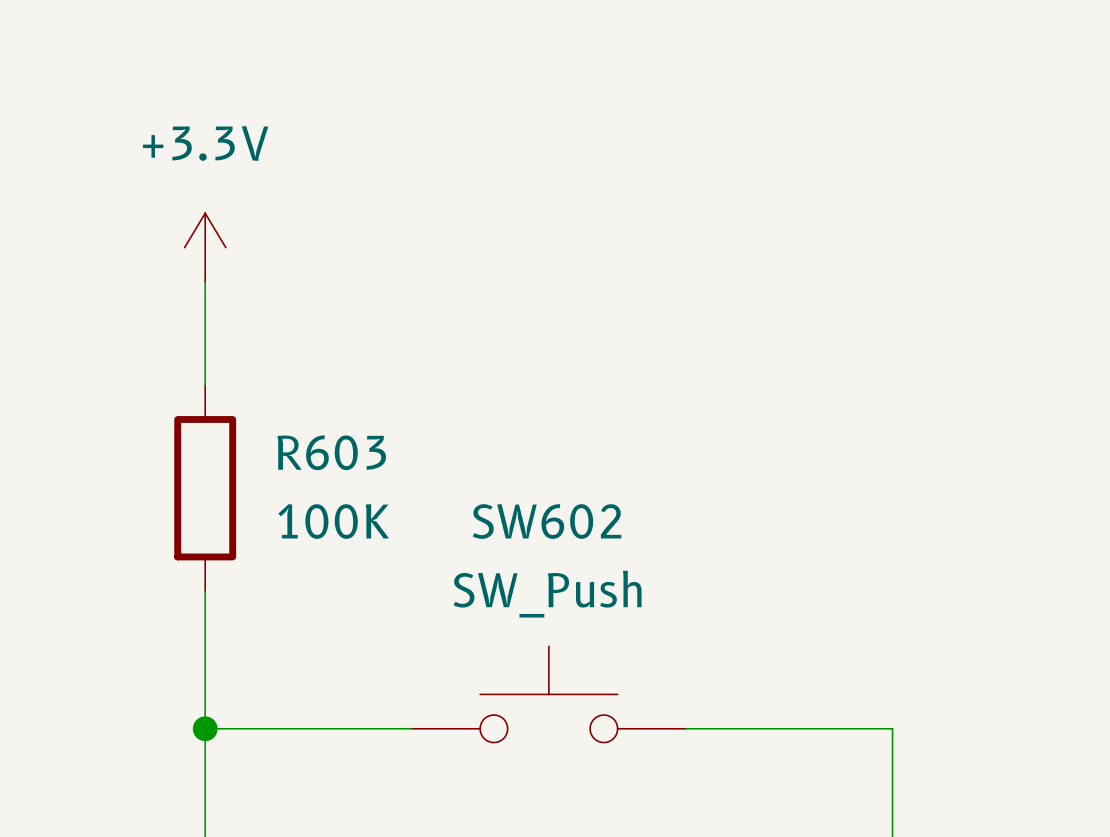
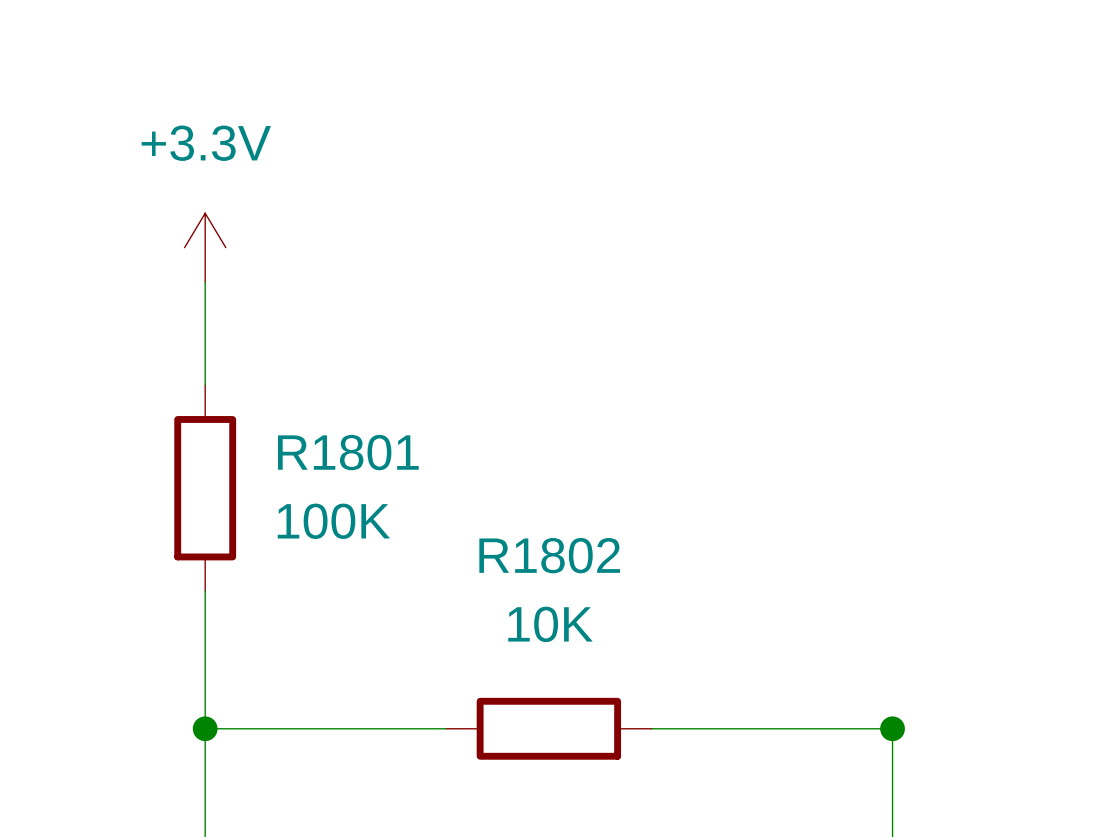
R603 name: R603 (331, 452) -> R1801 (348, 452)
SW602: SW_Push (548, 694) -> none
R1802: none -> 10K (548, 728)
junction: none -> (892, 728)

